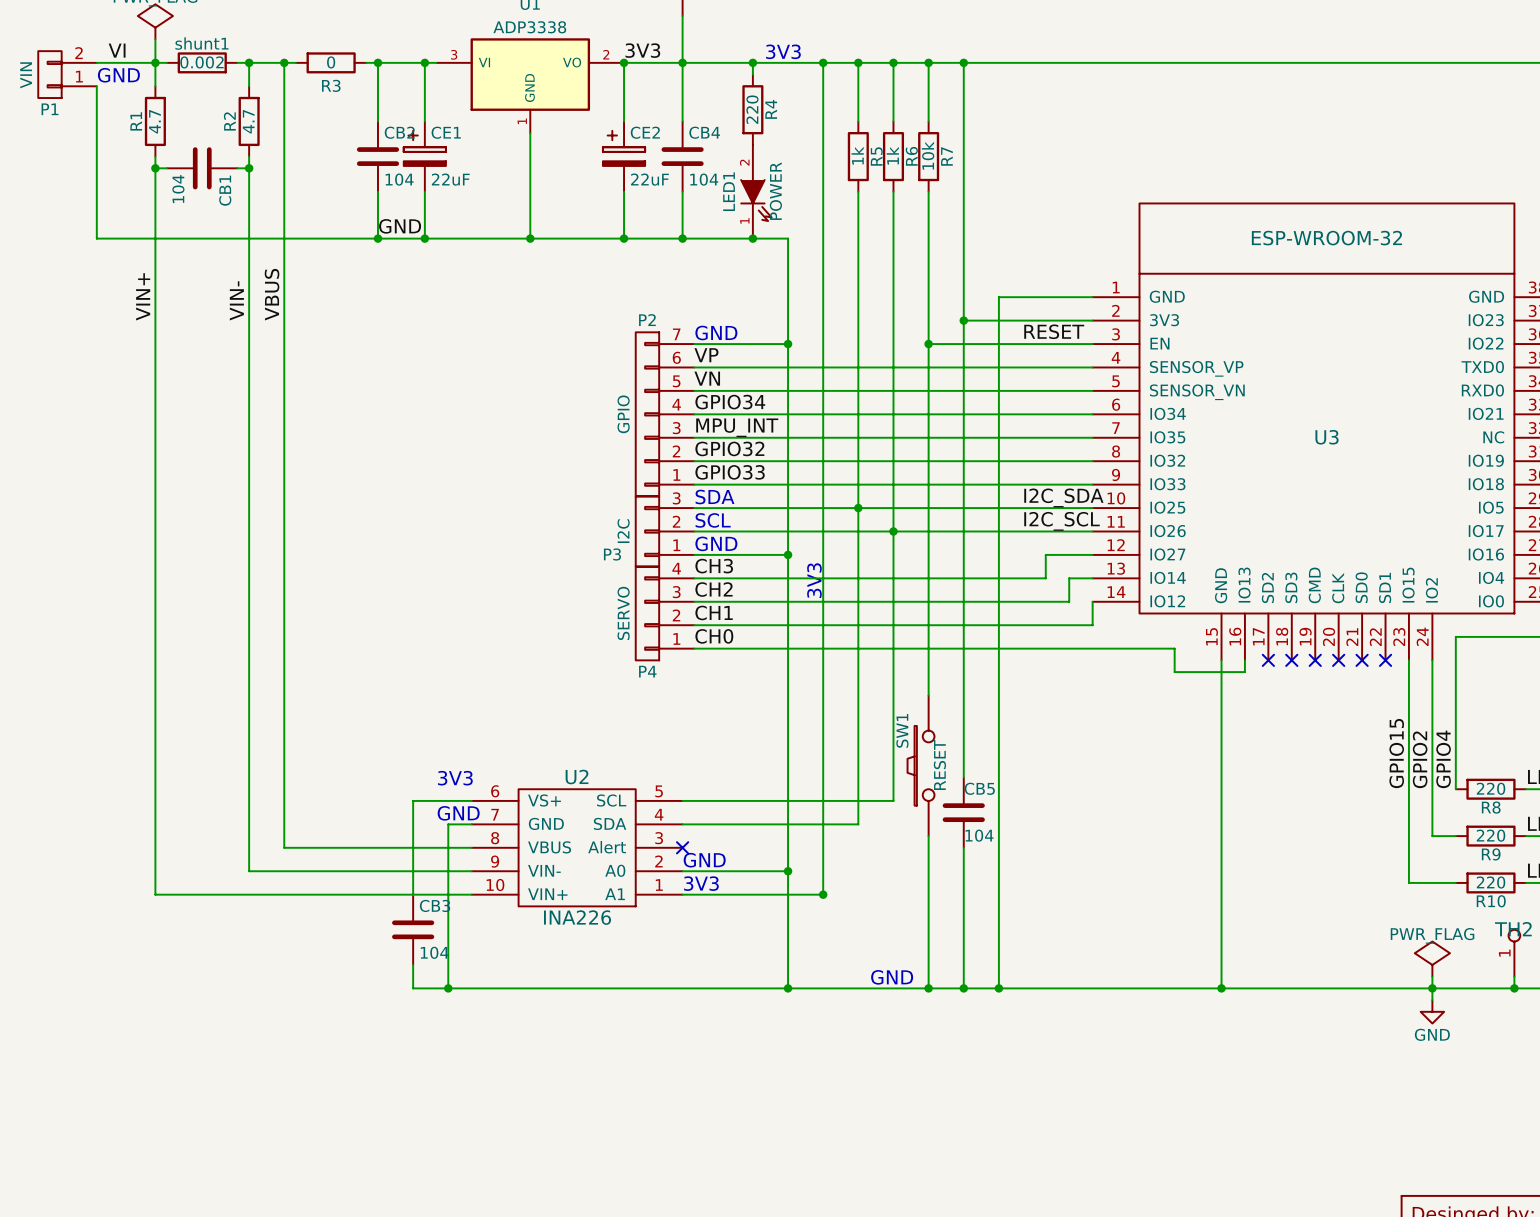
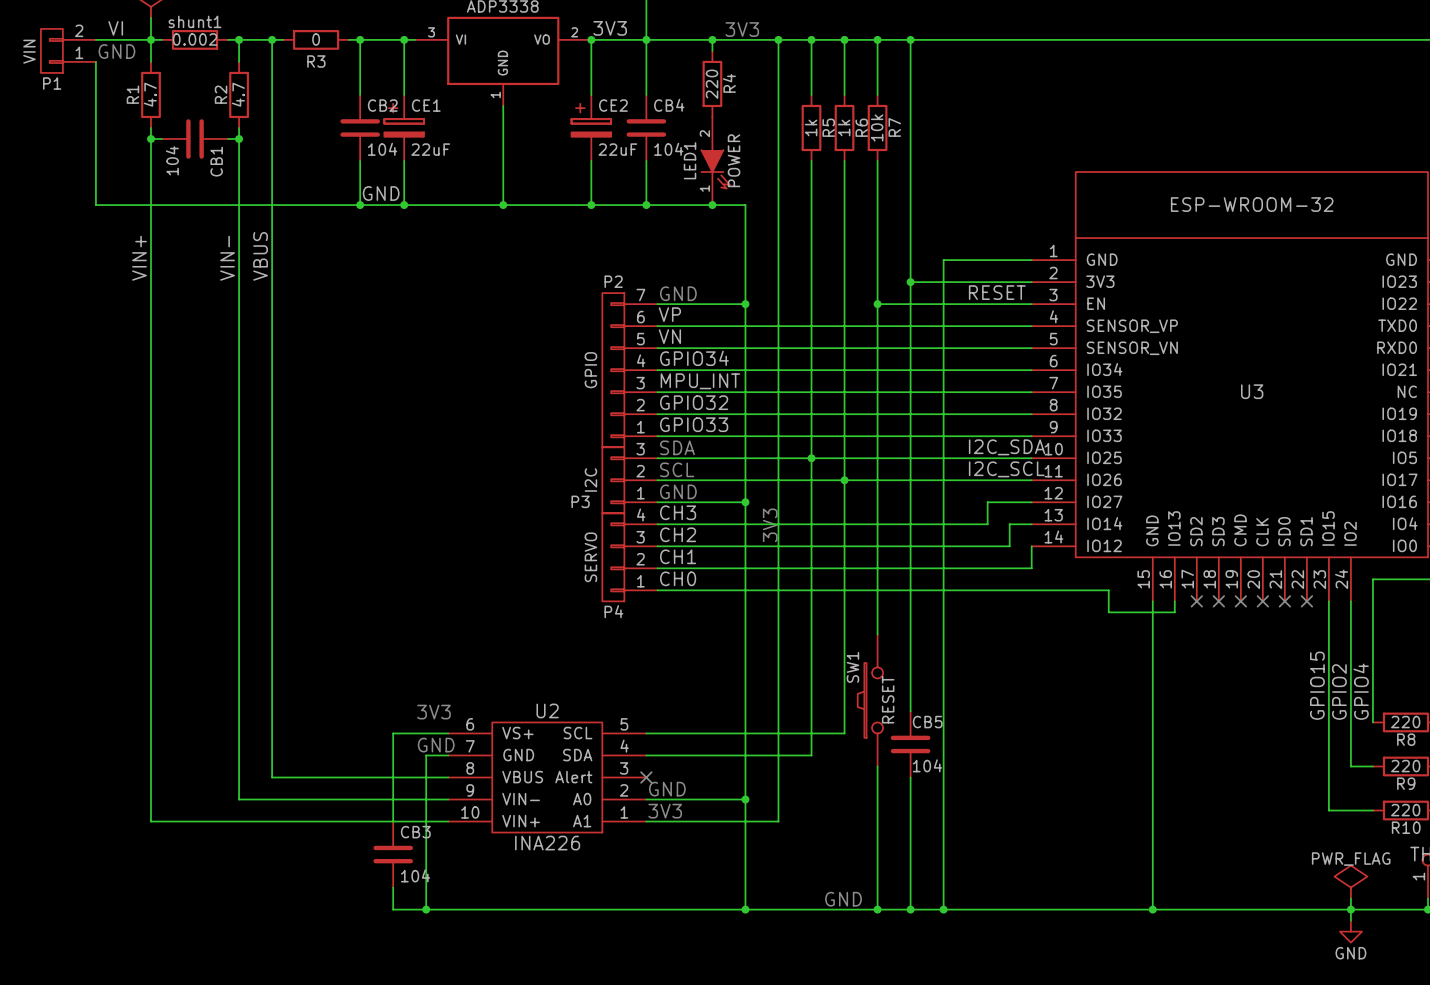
junction: (823, 894) -> none

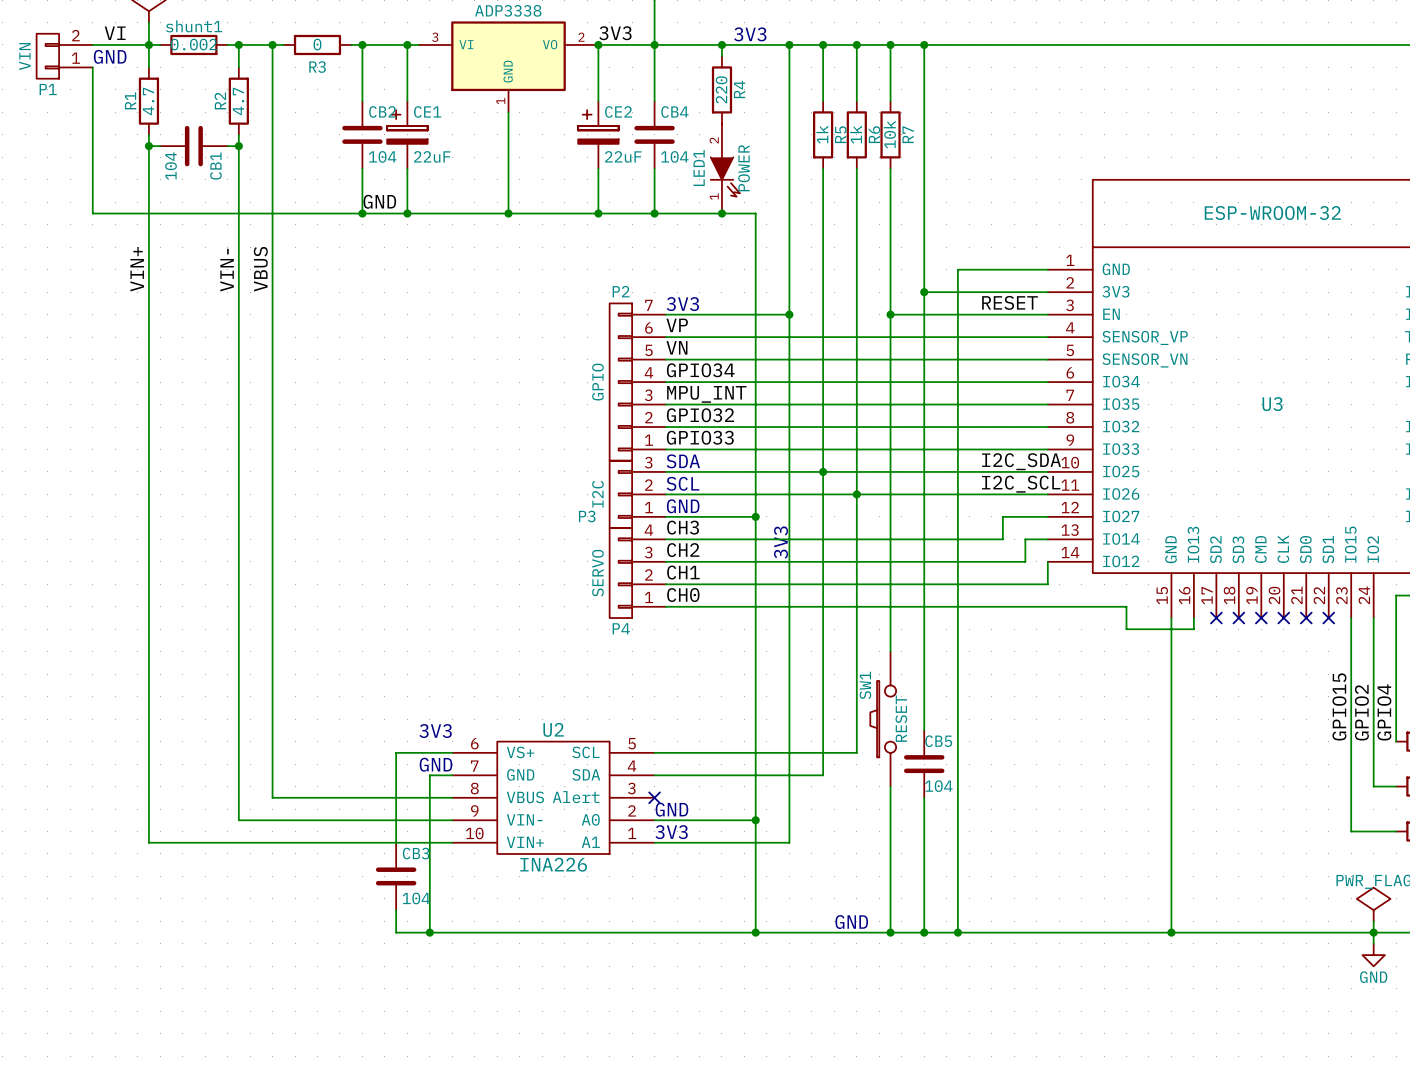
text: GND (678, 293) -> 3V3 (682, 304)
wire: none -> (755, 314) (789, 314)
junction position: (745, 304) -> (789, 314)

